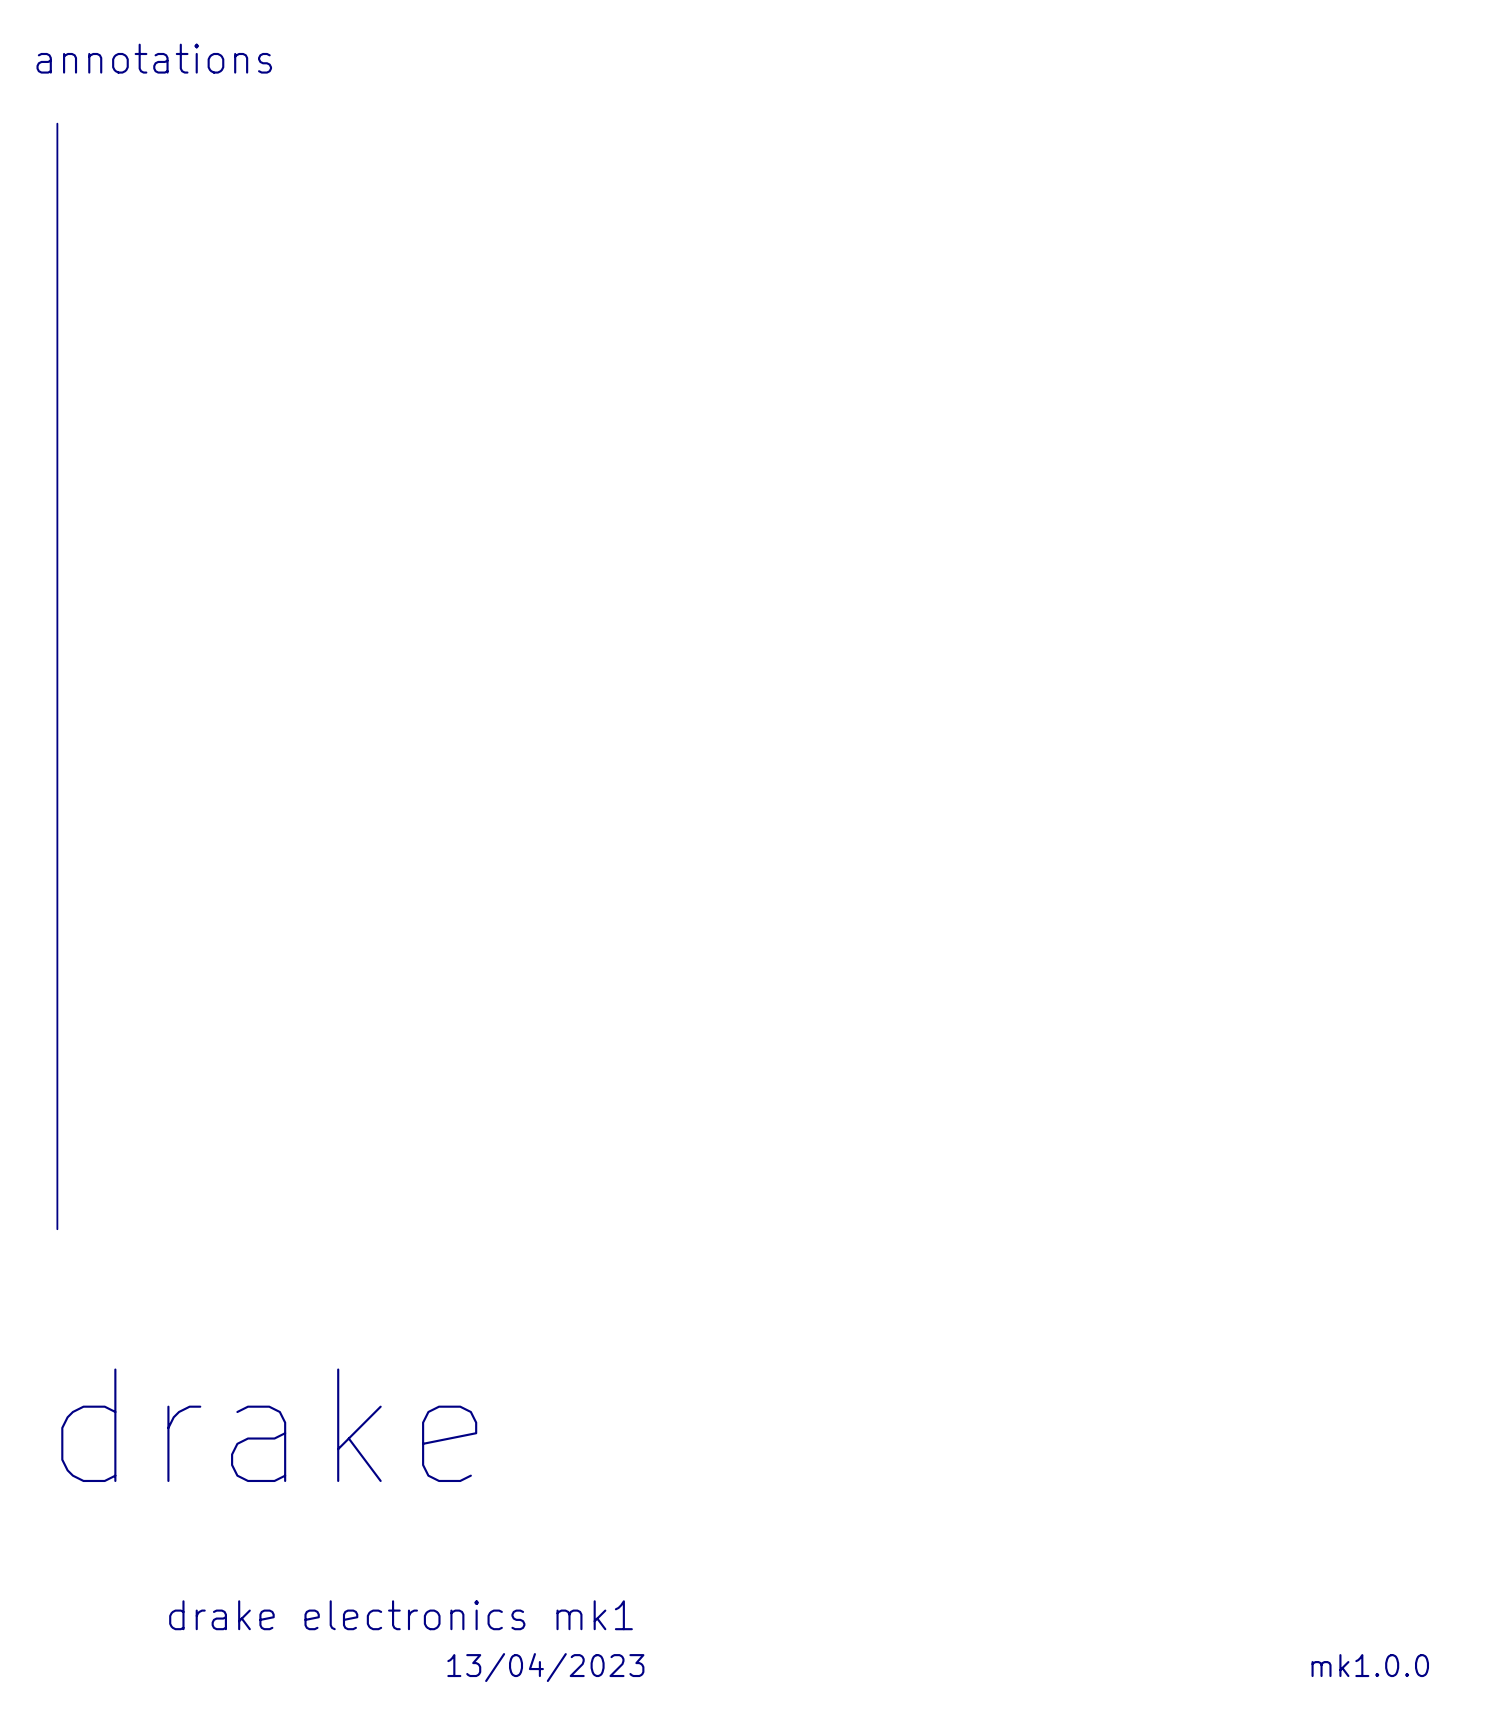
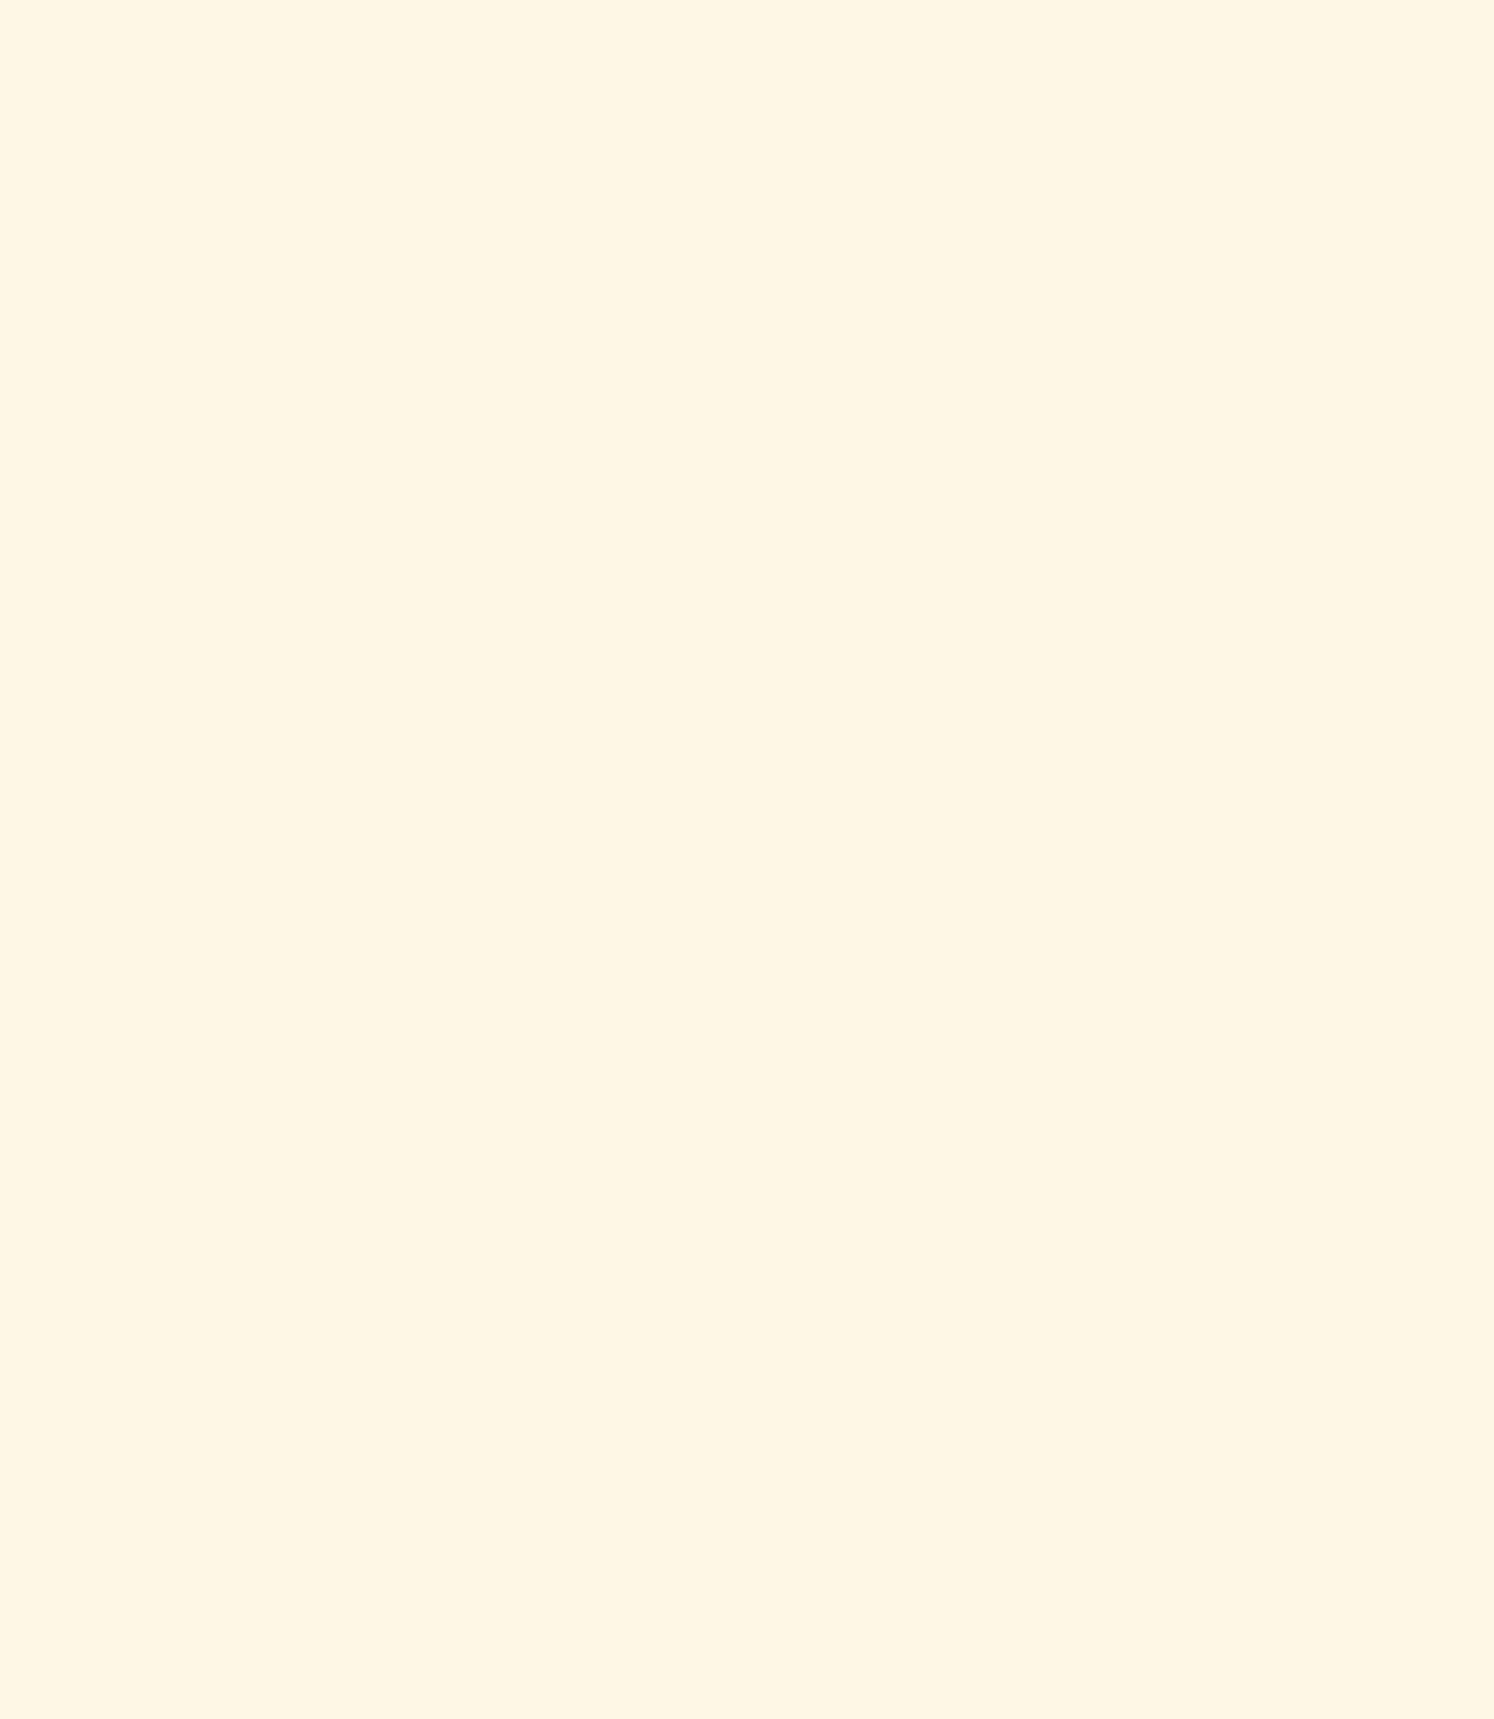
text: annotations (154, 58) -> none
line: (57, 123) (57, 1229) -> none
text: drake (269, 1425) -> none
text: drake electronics mk1 (401, 1615) -> none
text: mk1.0.0 (1370, 1665) -> none
text: 13/04/2023 (545, 1667) -> none

